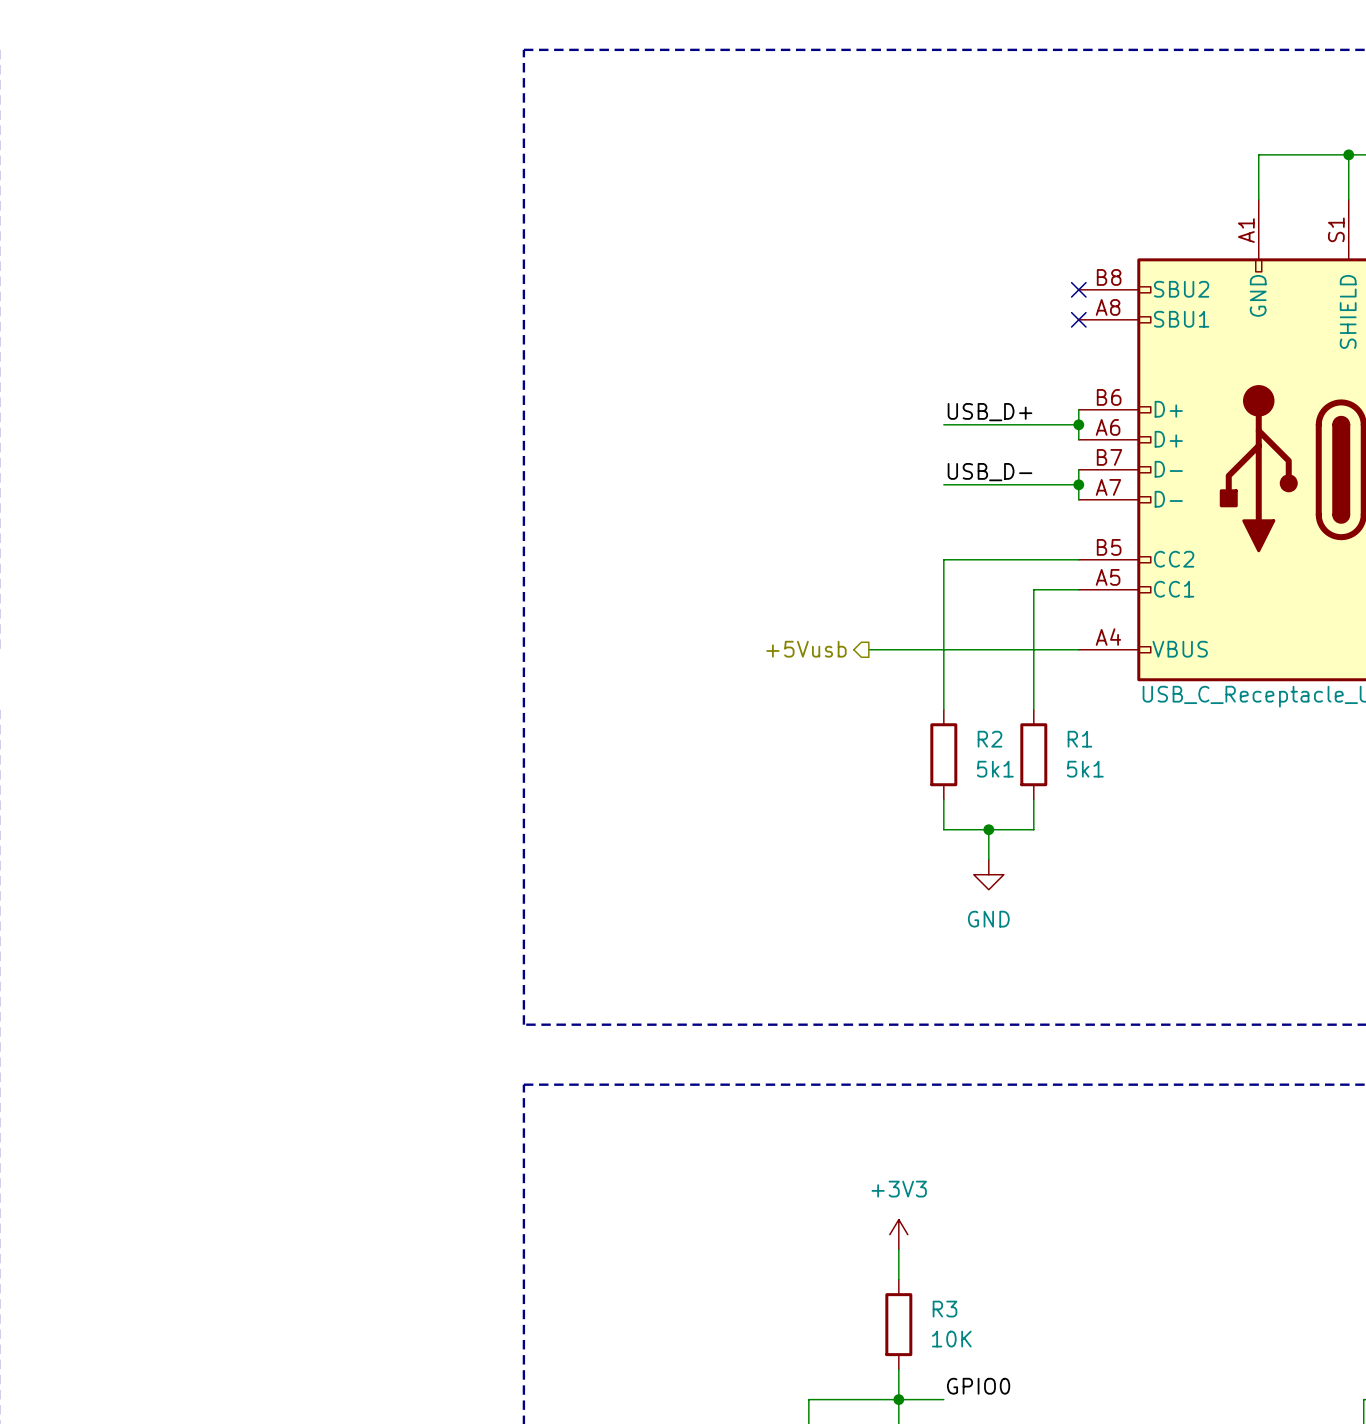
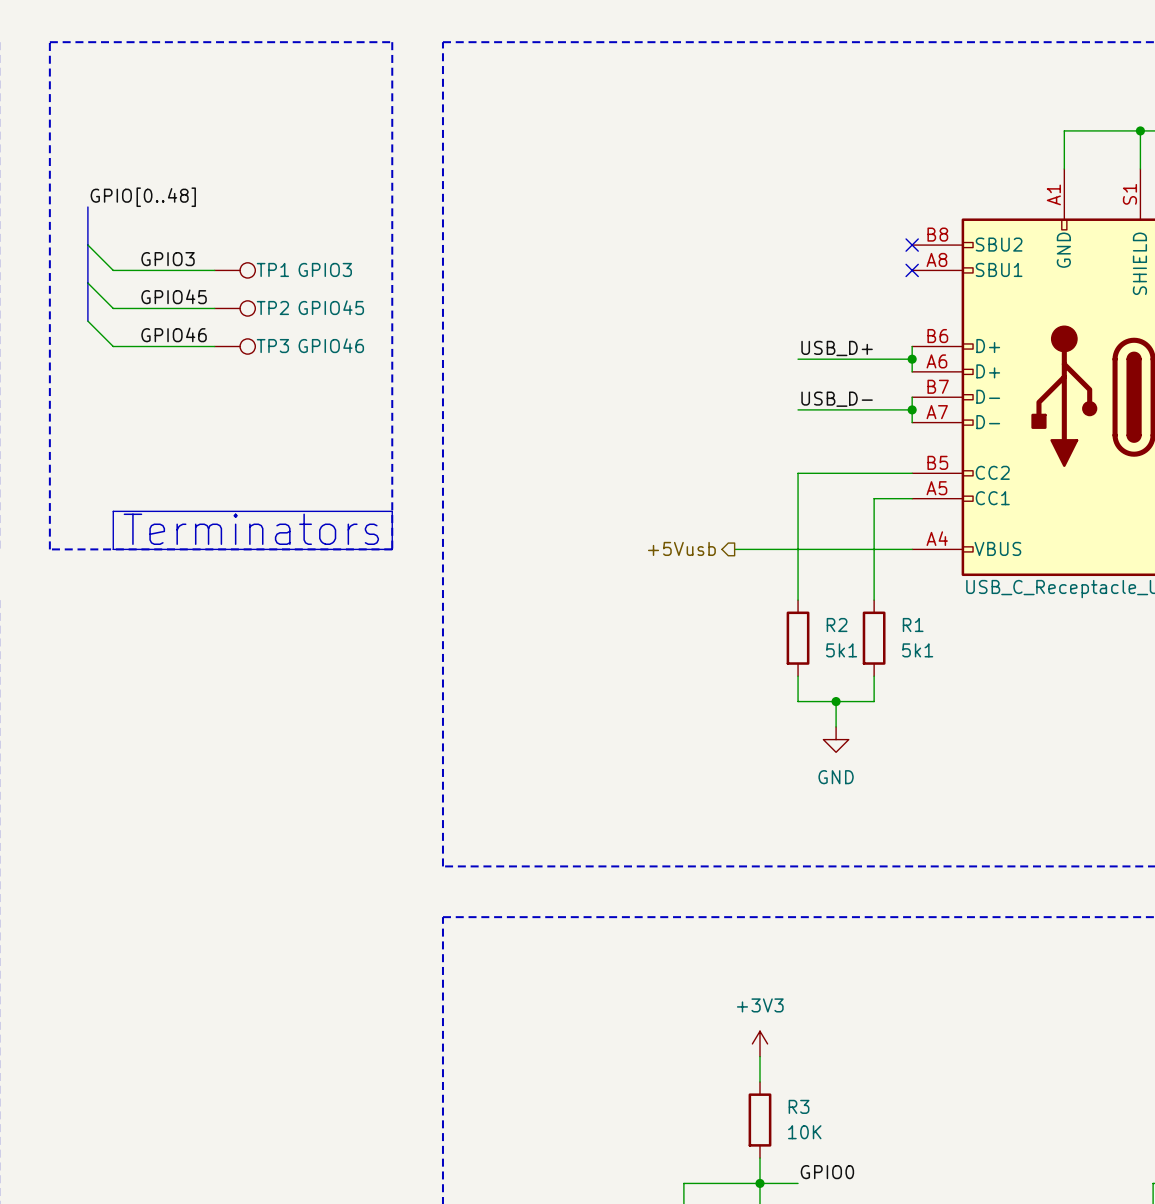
label: none -> GPIO[0..48] (143, 197)
bus: none -> (87, 207) (87, 321)
wire: none -> (87, 245) (113, 270) (214, 270)
label: none -> GPIO3 (168, 259)
TP1: none -> GPIO3 (235, 270)
wire: none -> (87, 283) (113, 308) (214, 308)
label: none -> GPIO45 (174, 296)
TP2: none -> GPIO45 (235, 308)
wire: none -> (87, 321) (113, 346) (214, 346)
label: none -> GPIO46 (174, 334)
TP3: none -> GPIO46 (235, 346)
text: none -> Terminators (251, 529)
line: none -> (392, 549) (392, 42) (49, 42) (49, 549) (392, 549)
line: none -> (392, 549) (392, 511) (113, 511) (113, 549) (392, 549)

